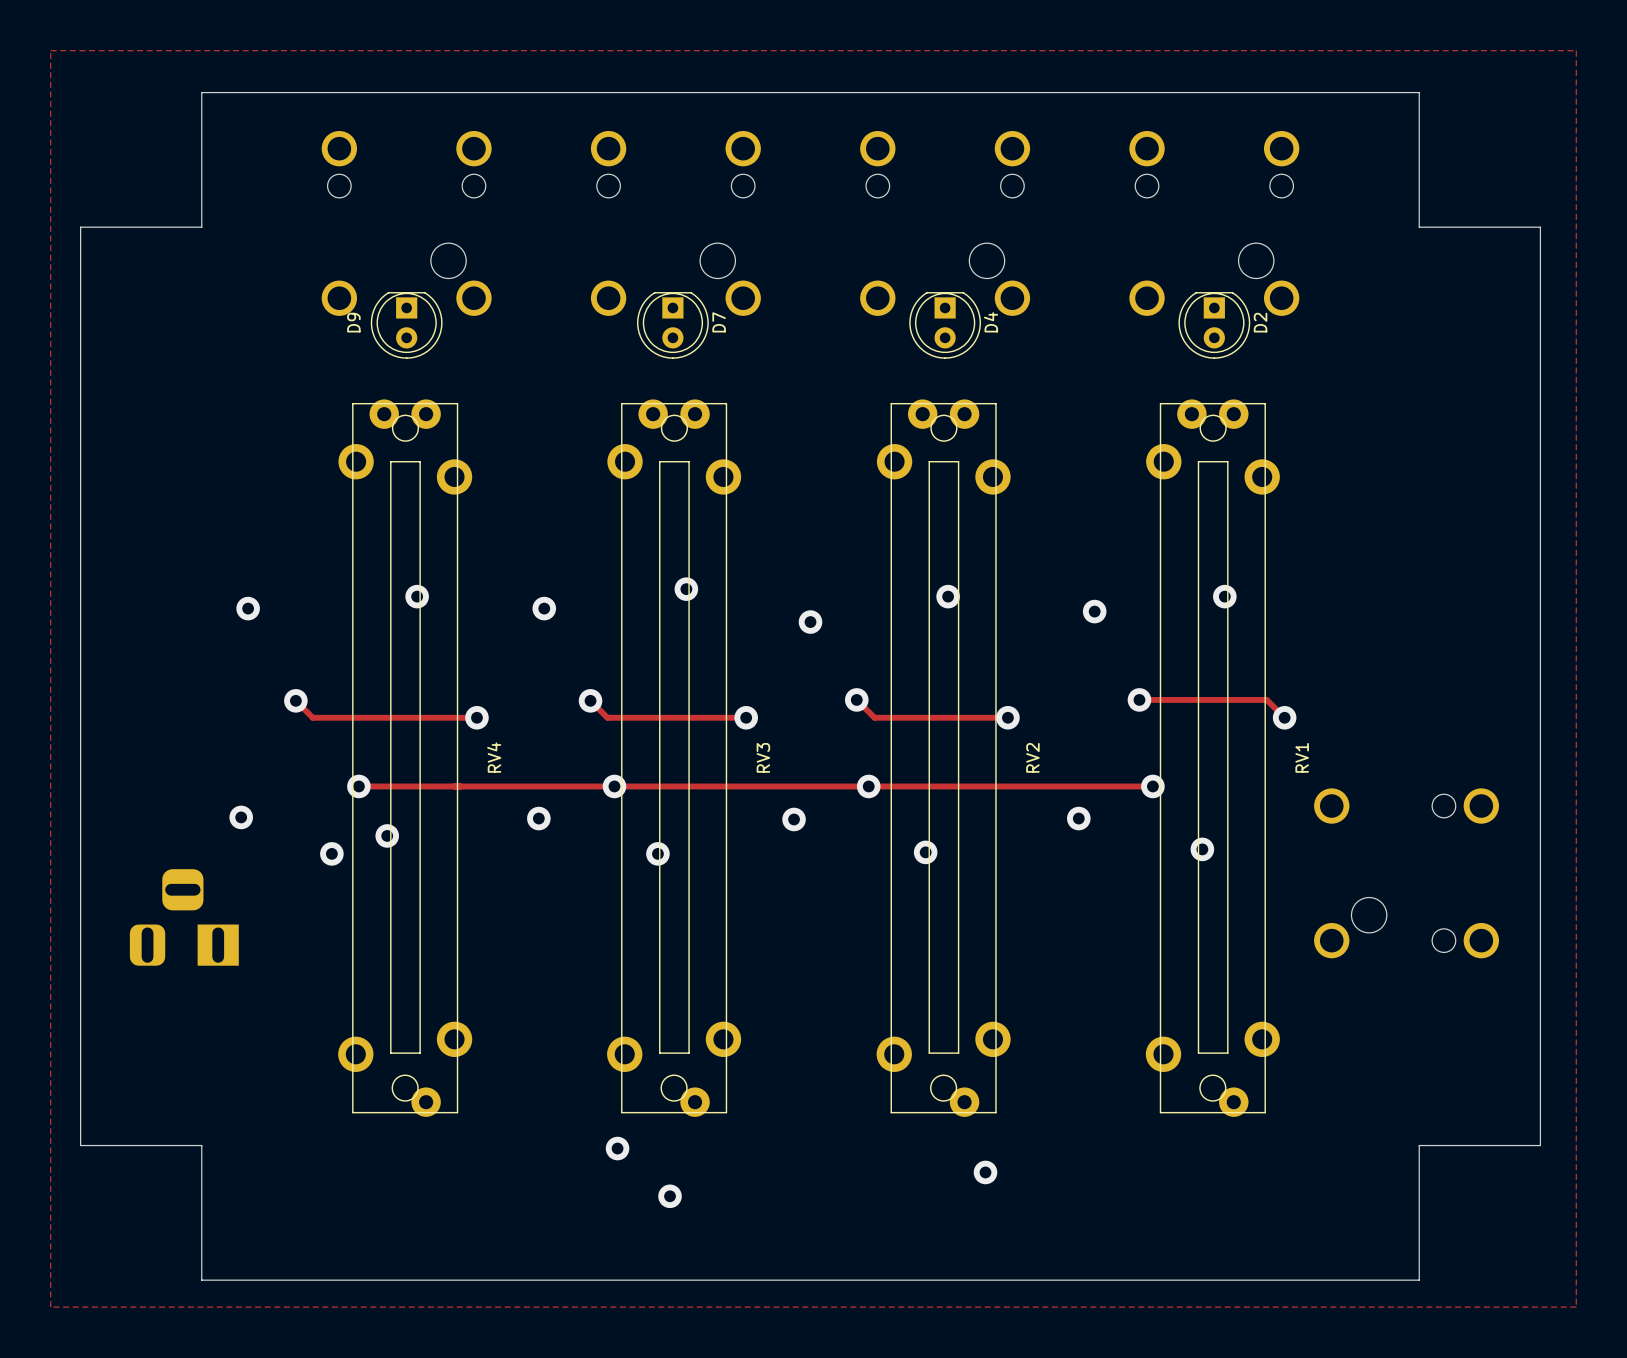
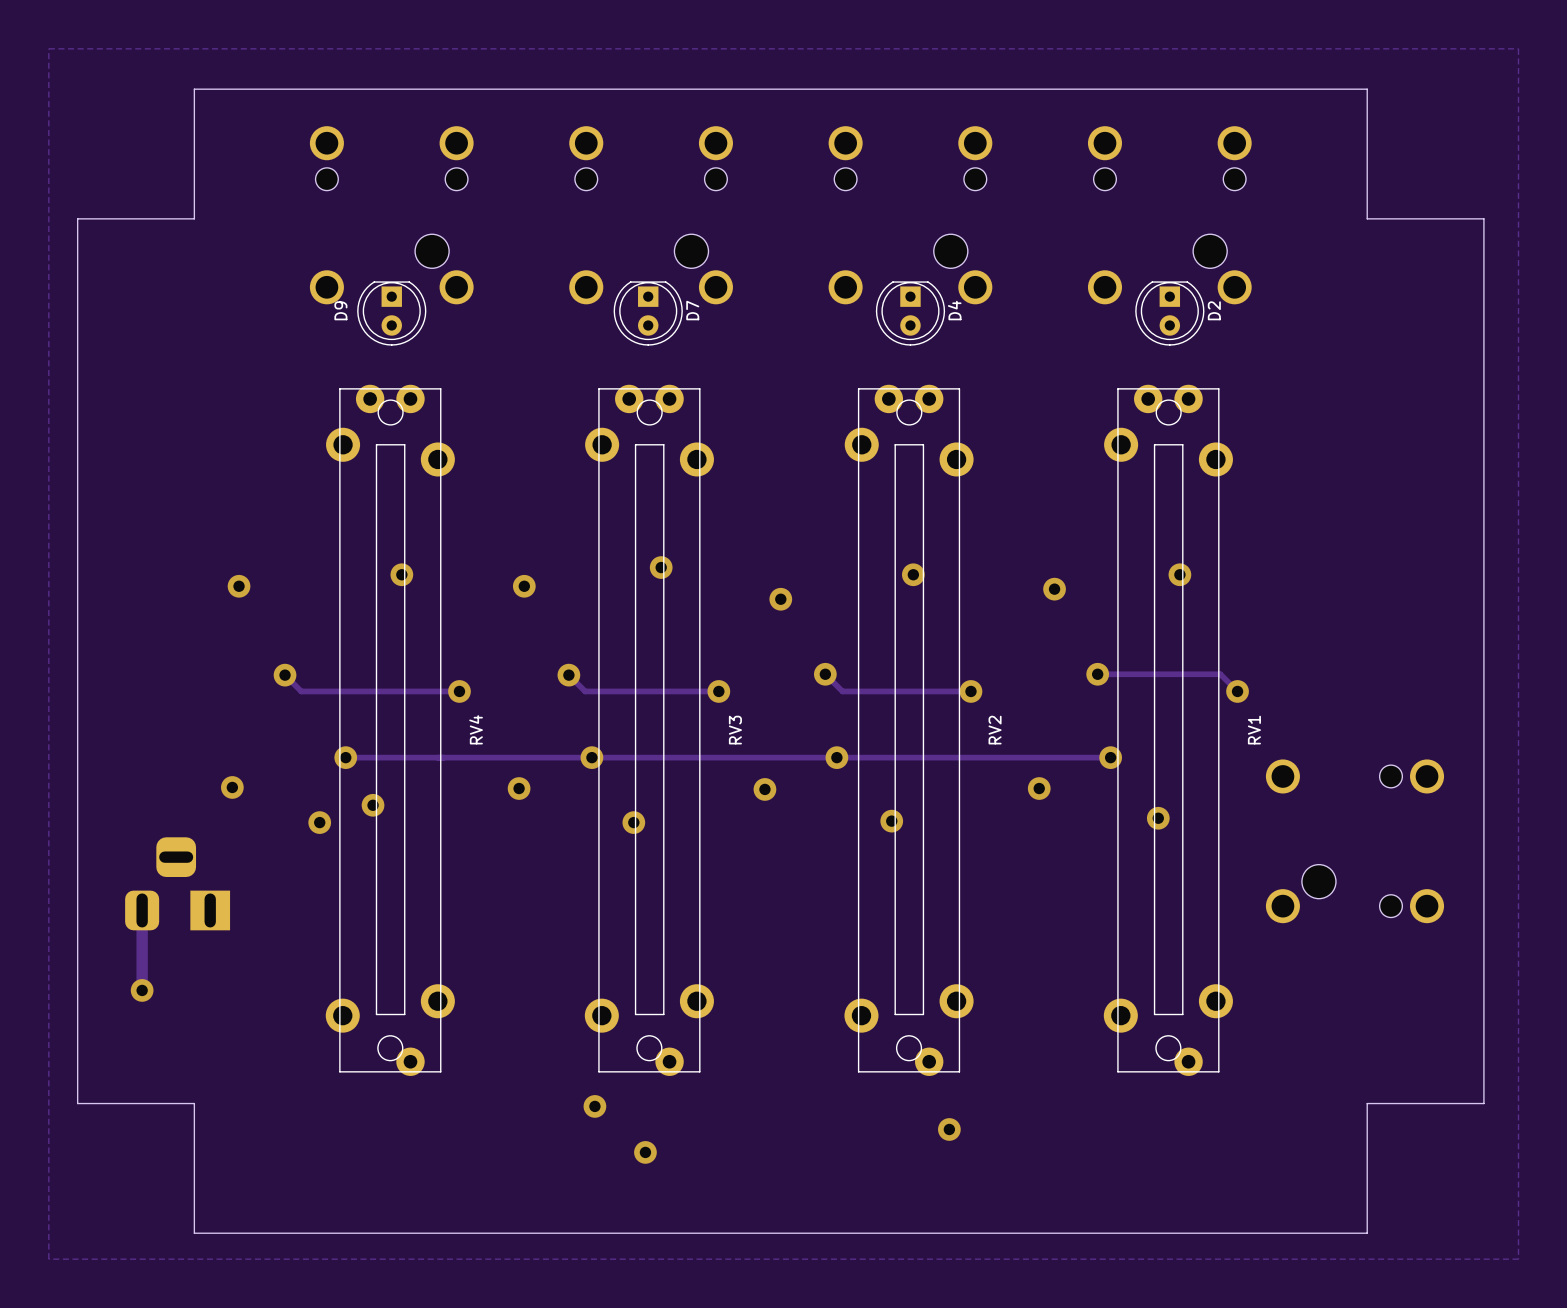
track: none -> (142, 910) (142, 990)
via: none -> (142, 990)

